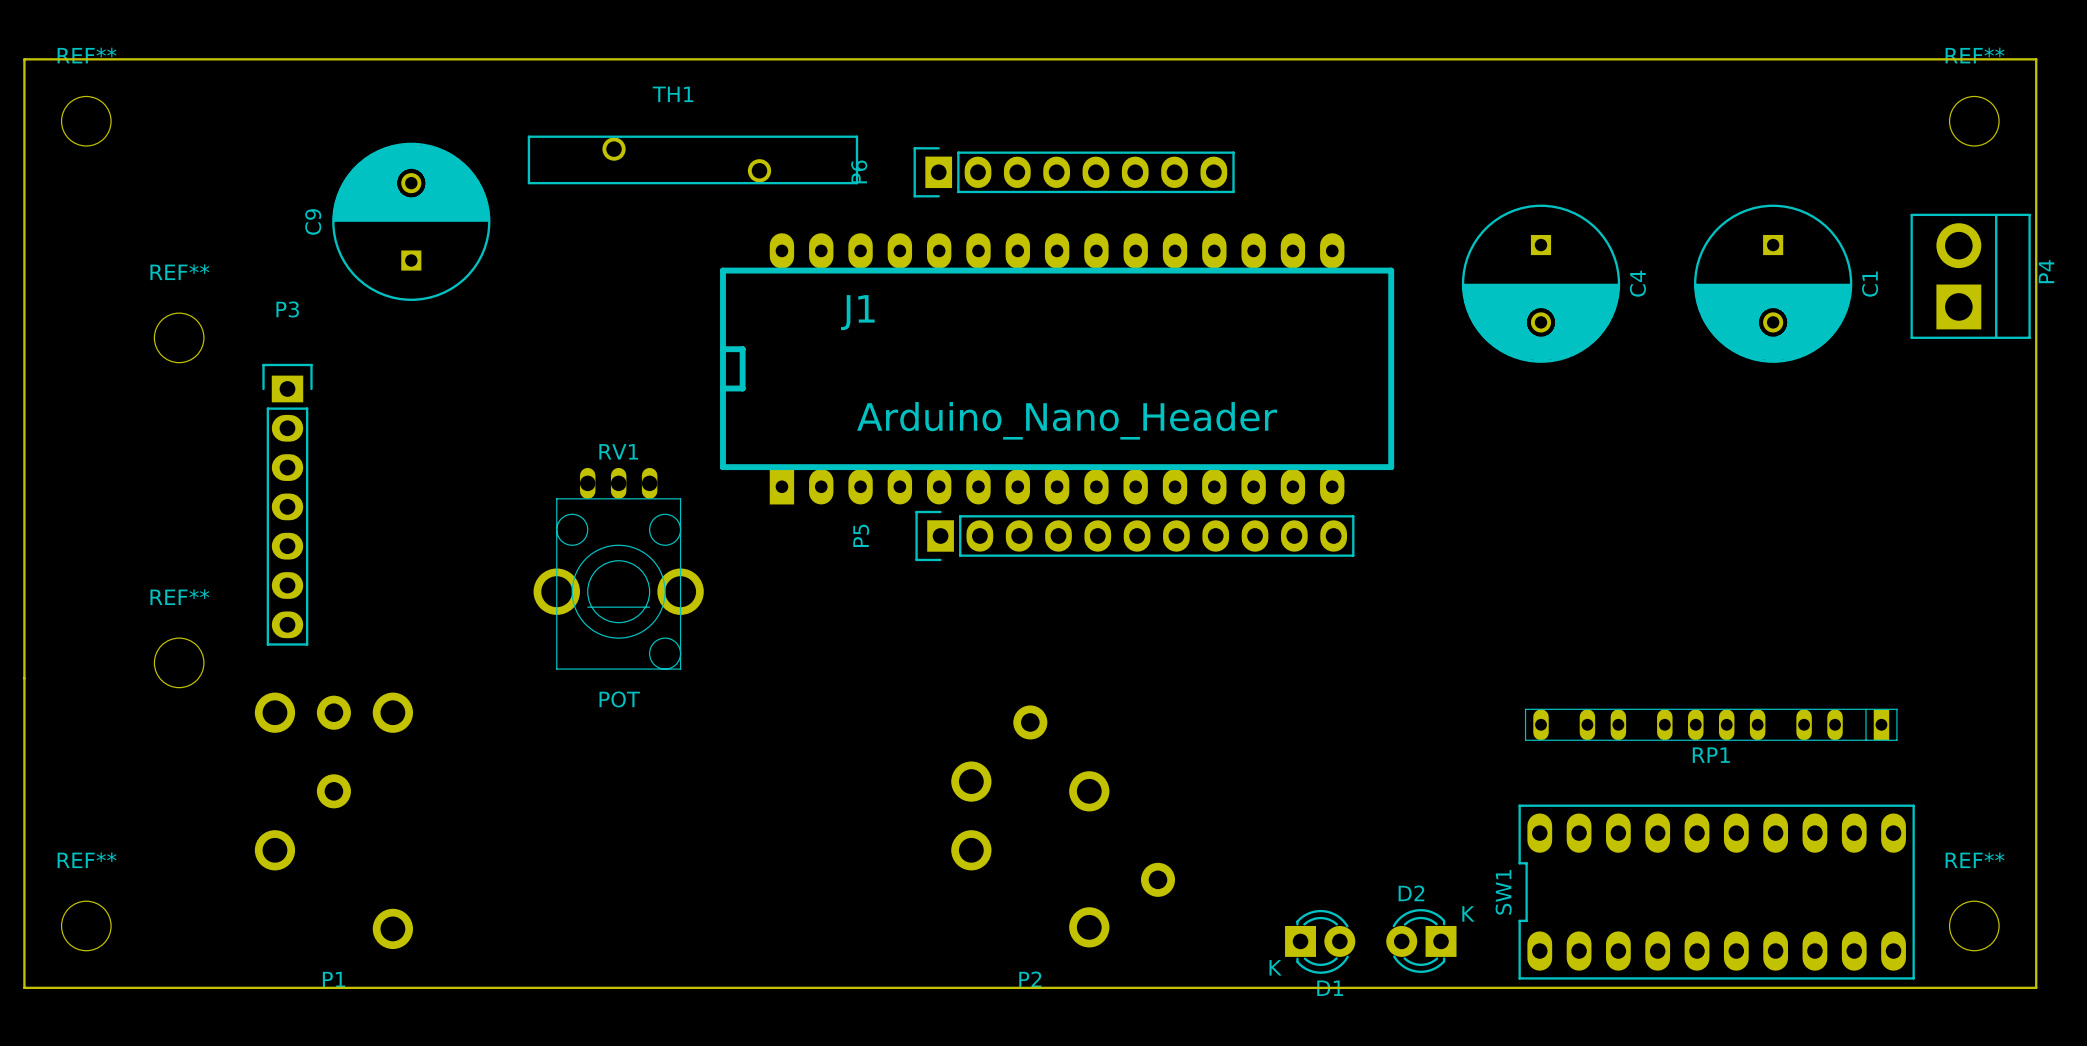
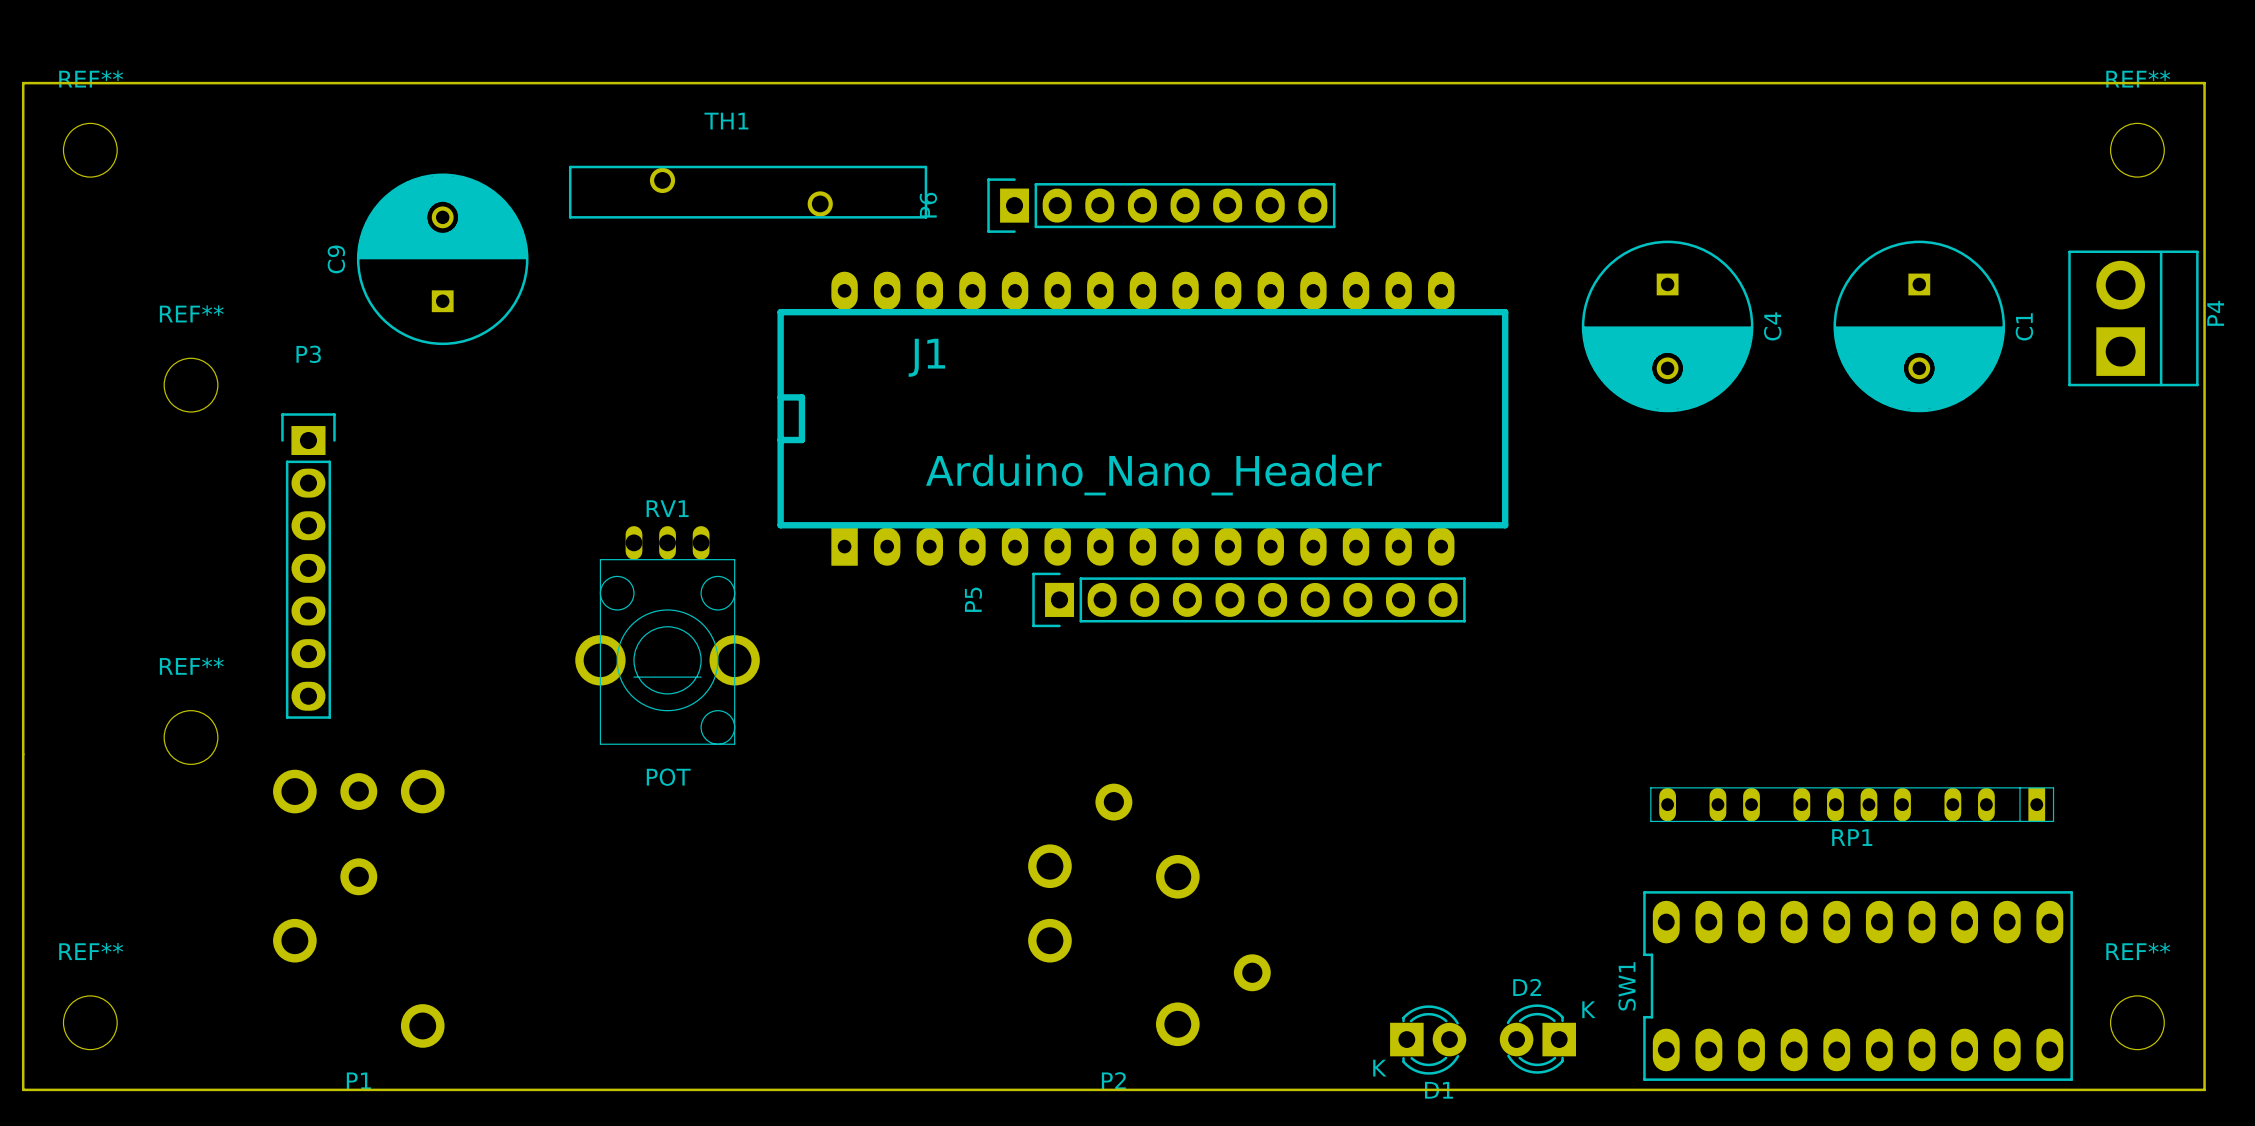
P5 footprint: [915, 510, 1355, 562] -> [1032, 572, 1466, 628]

